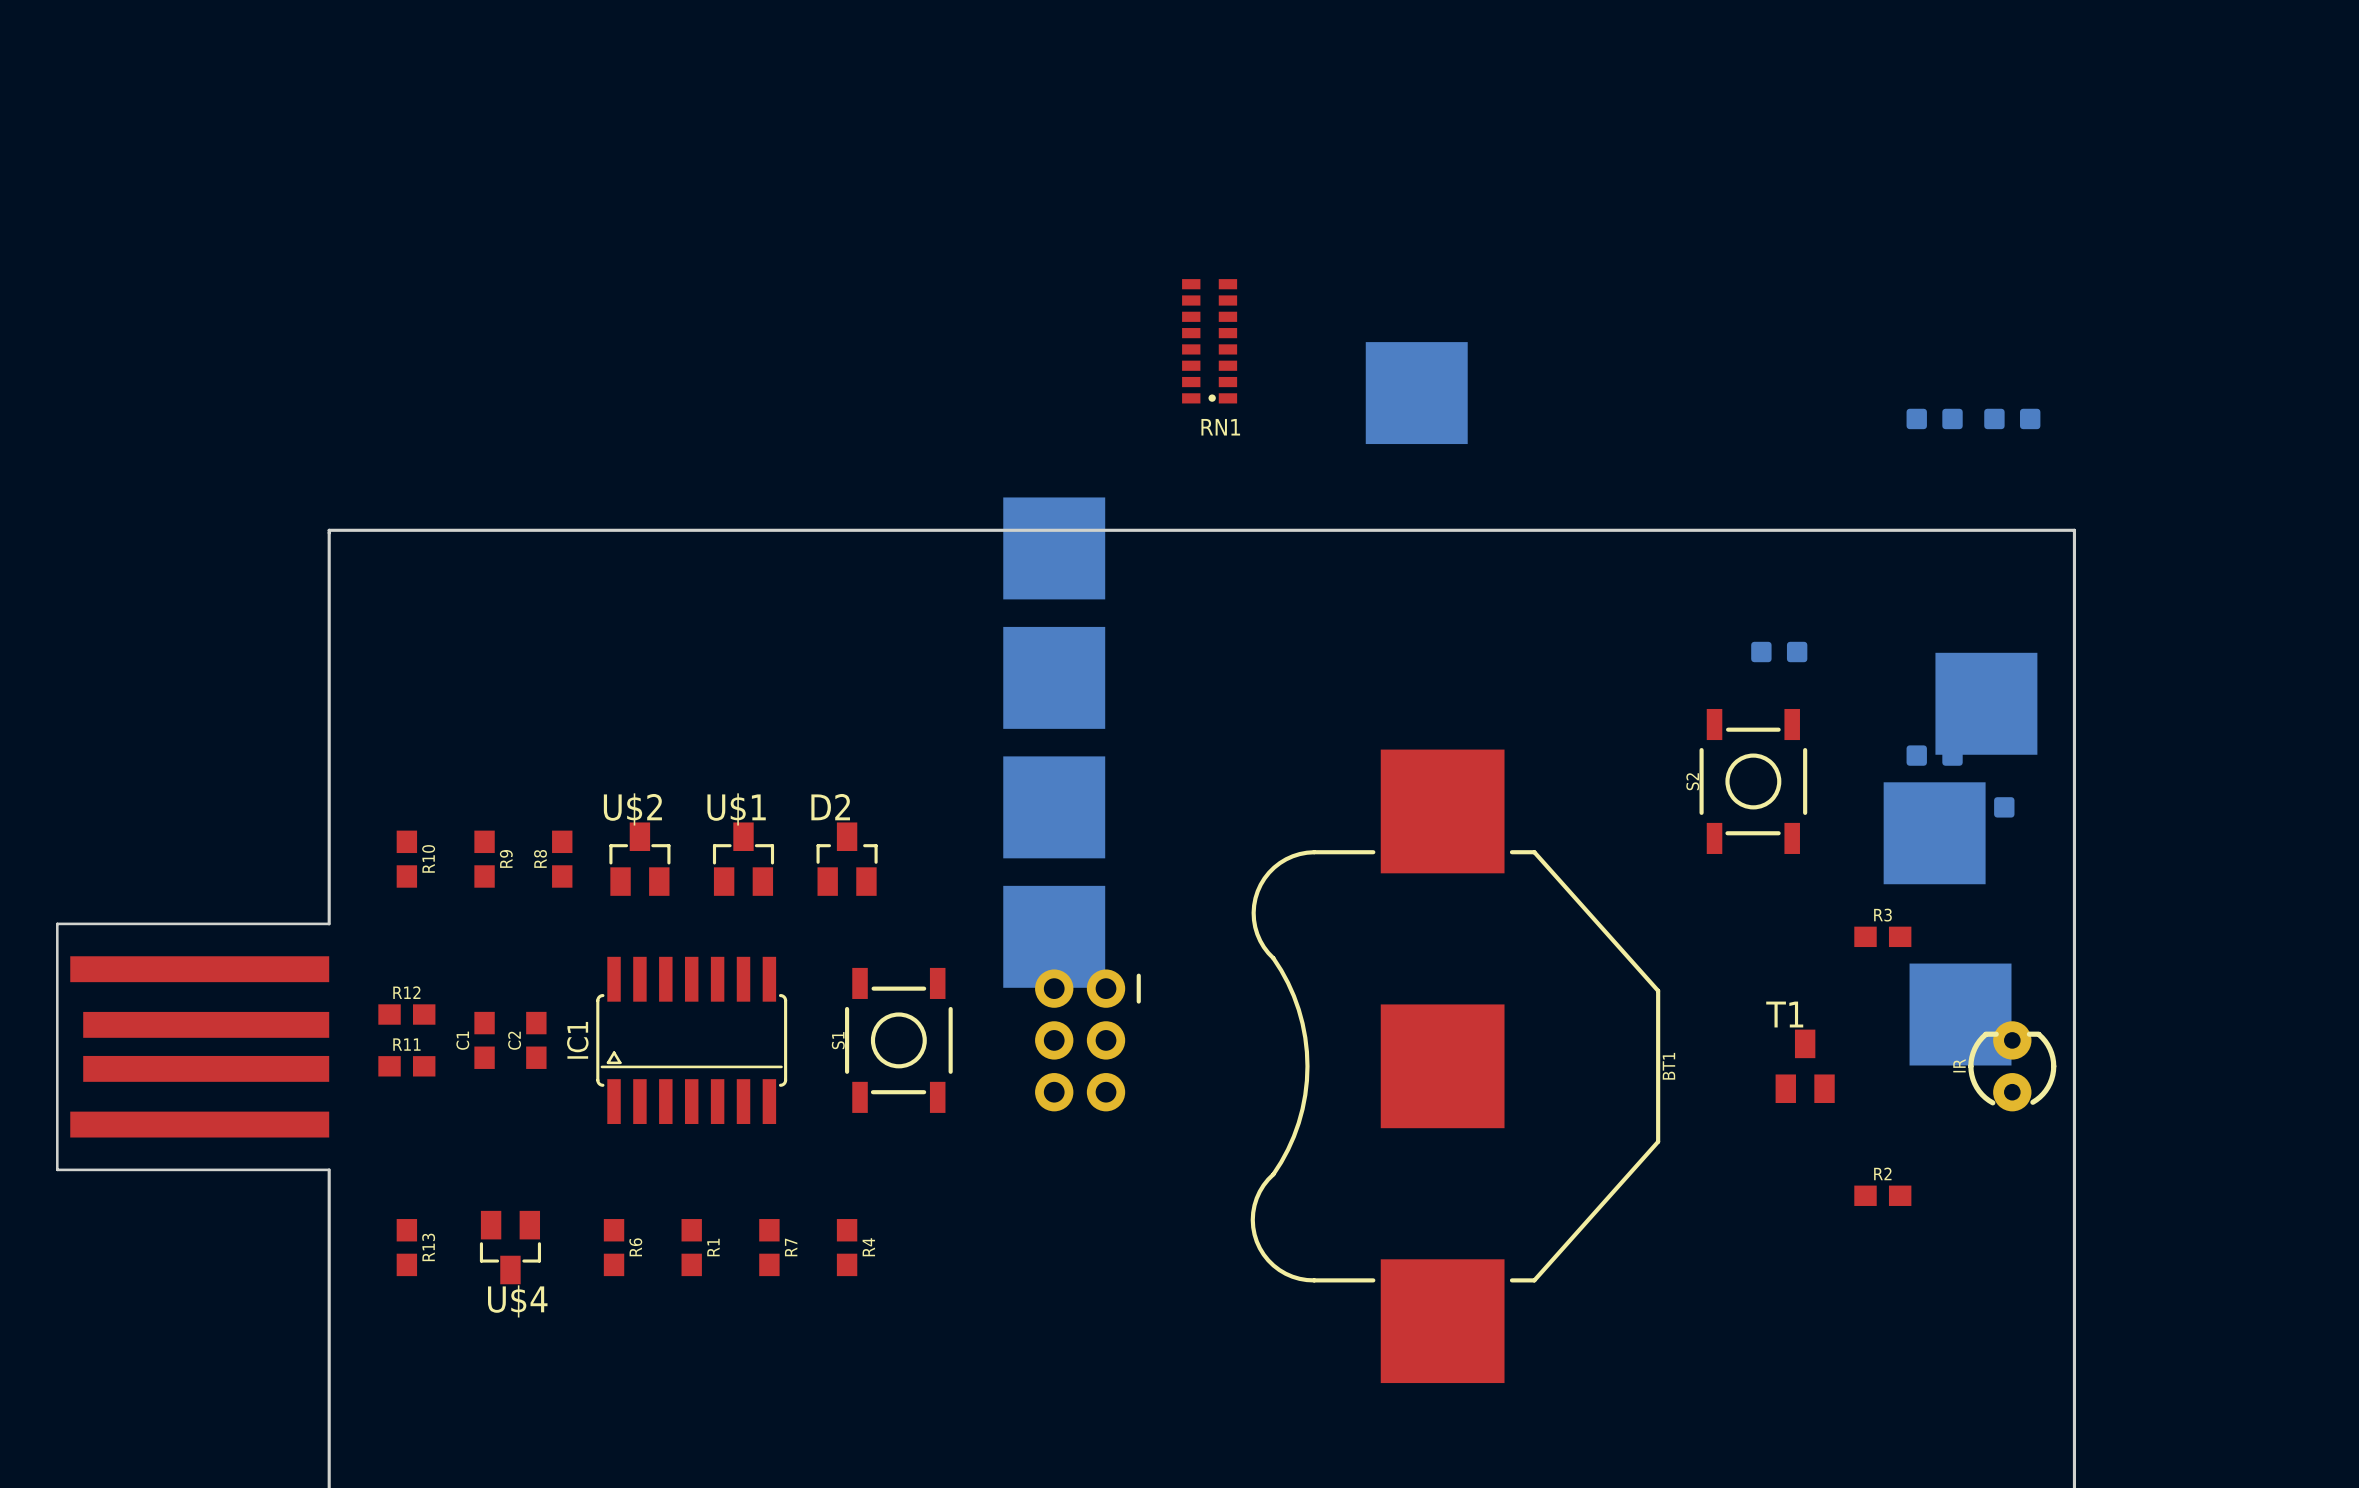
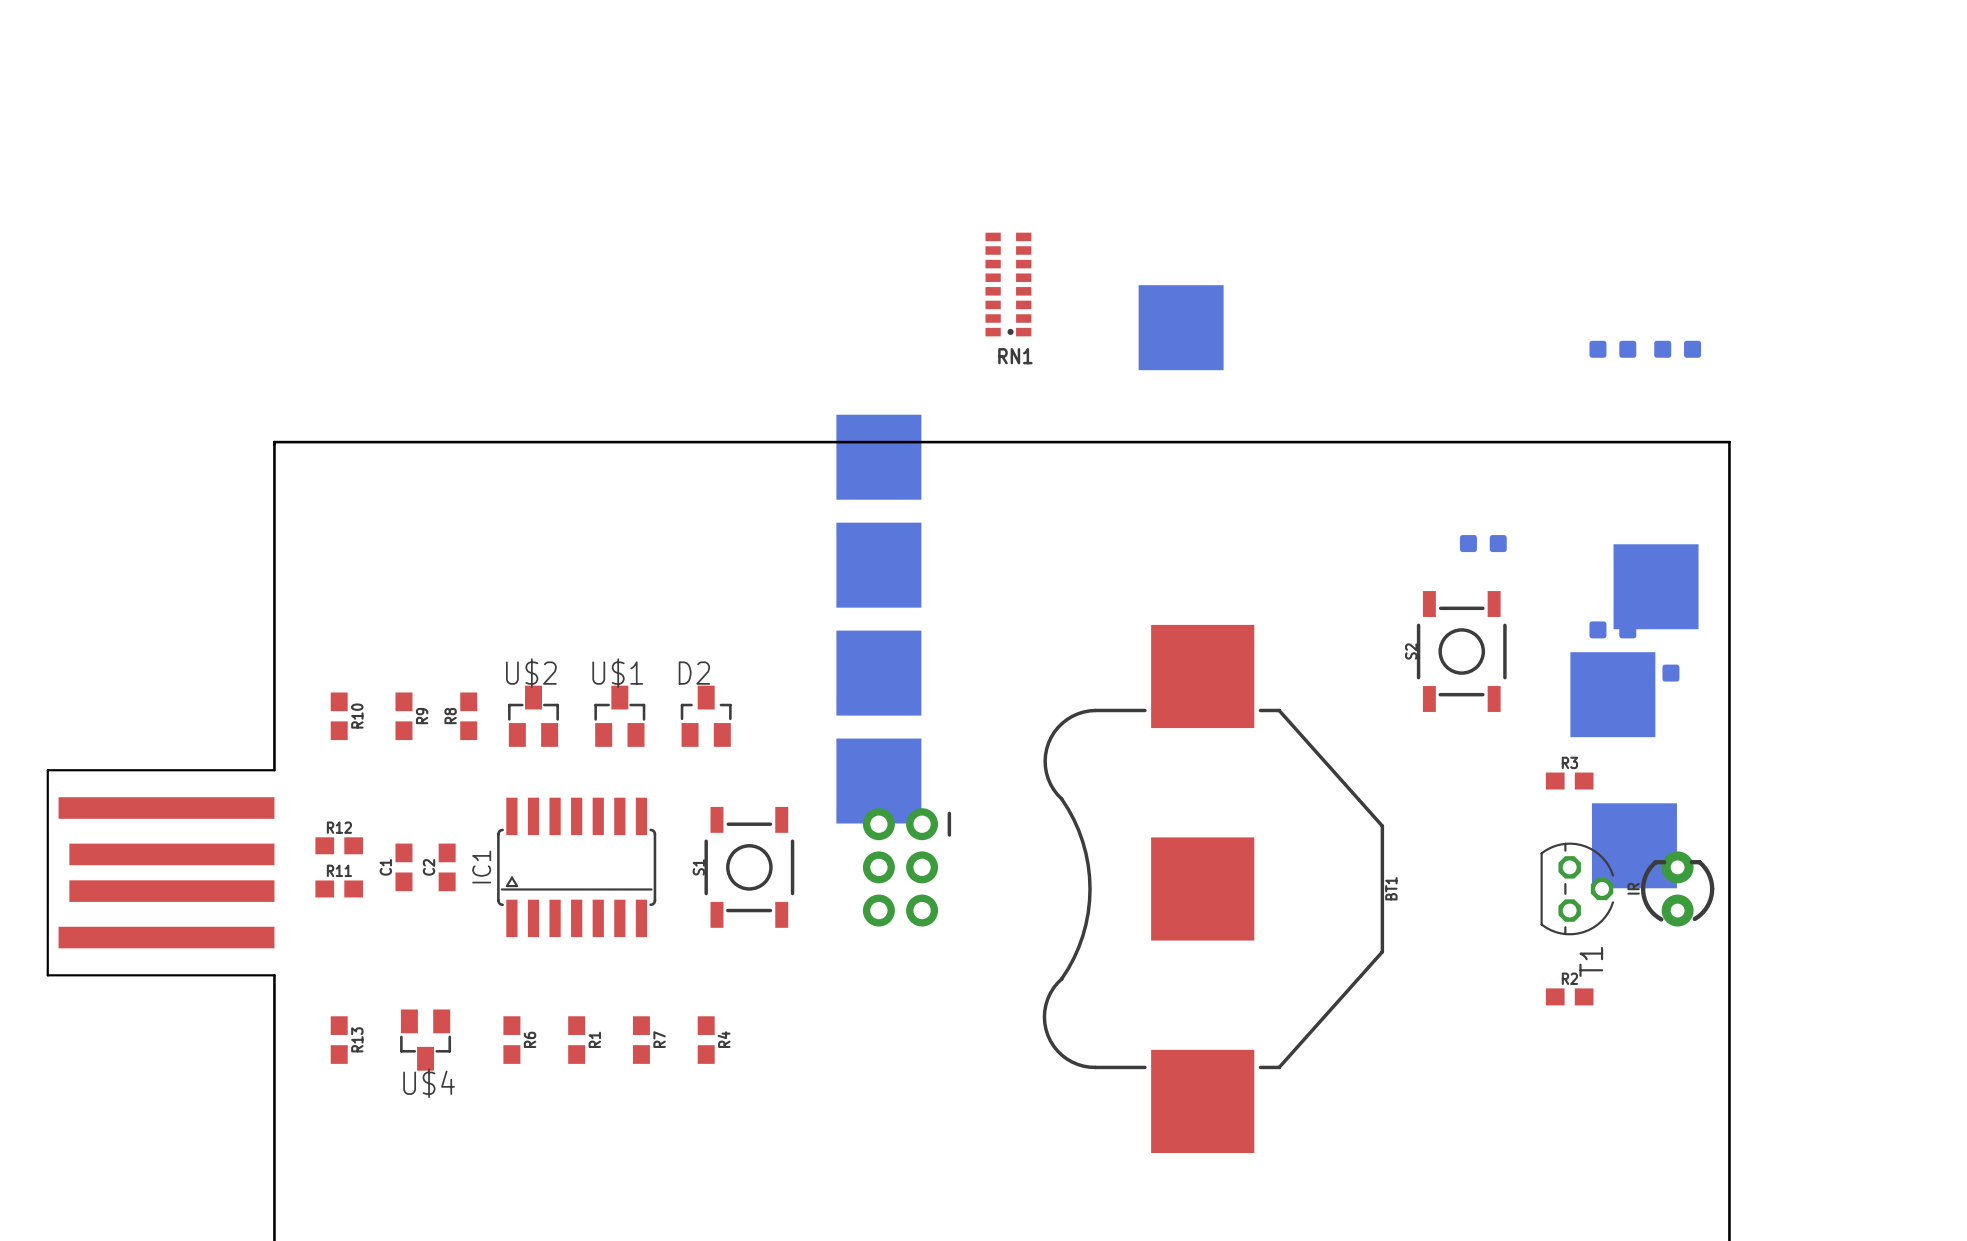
T1 name position: T1 (1784, 1014) -> T1 (1591, 961)
T1 footprint: [1775, 1029, 1835, 1104] -> [1540, 842, 1615, 936]

